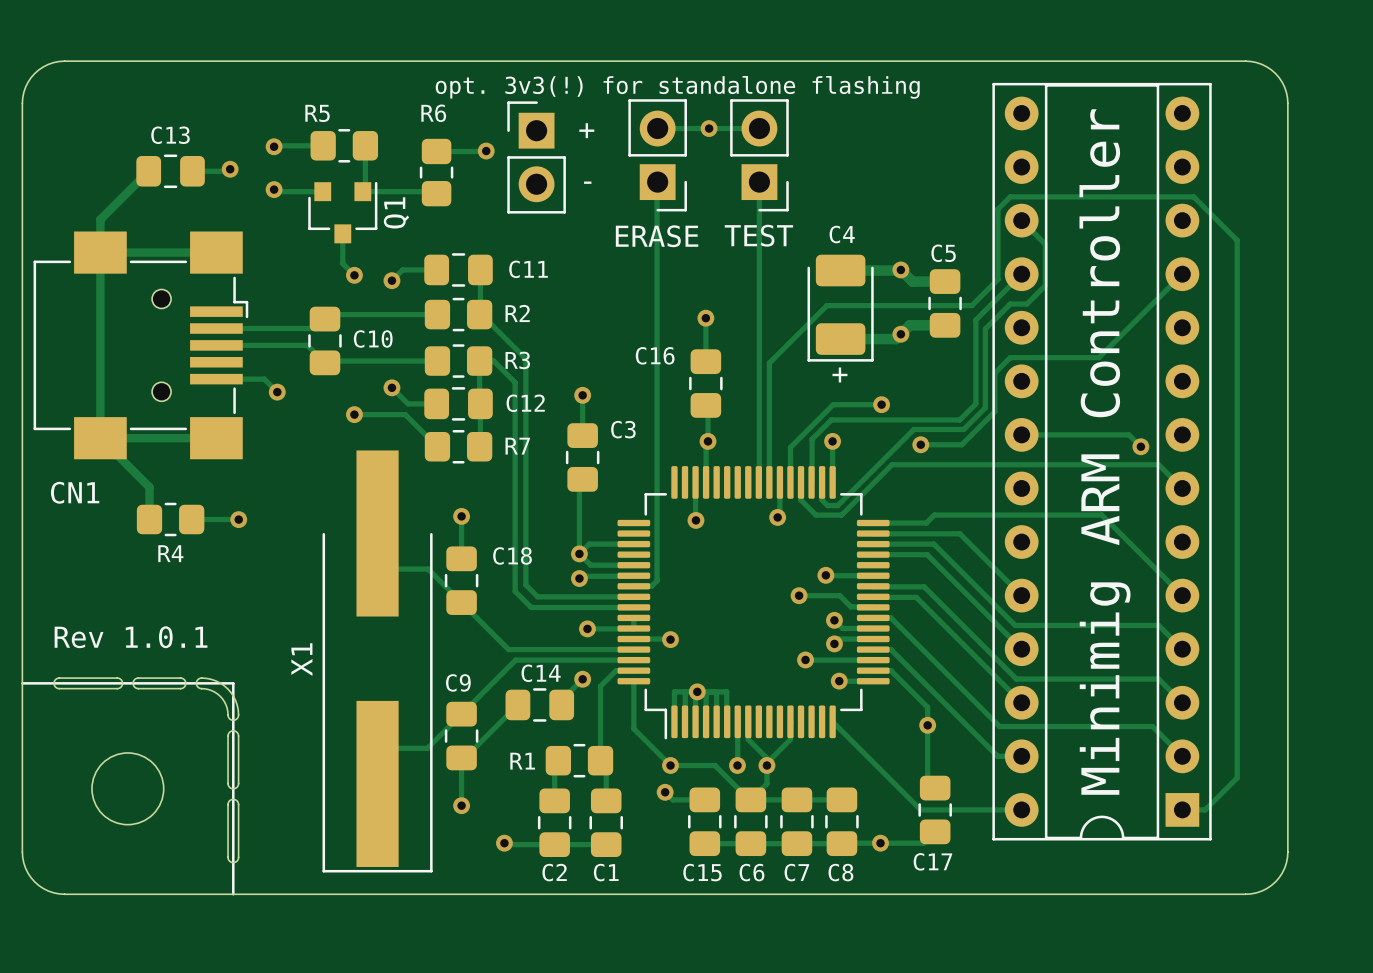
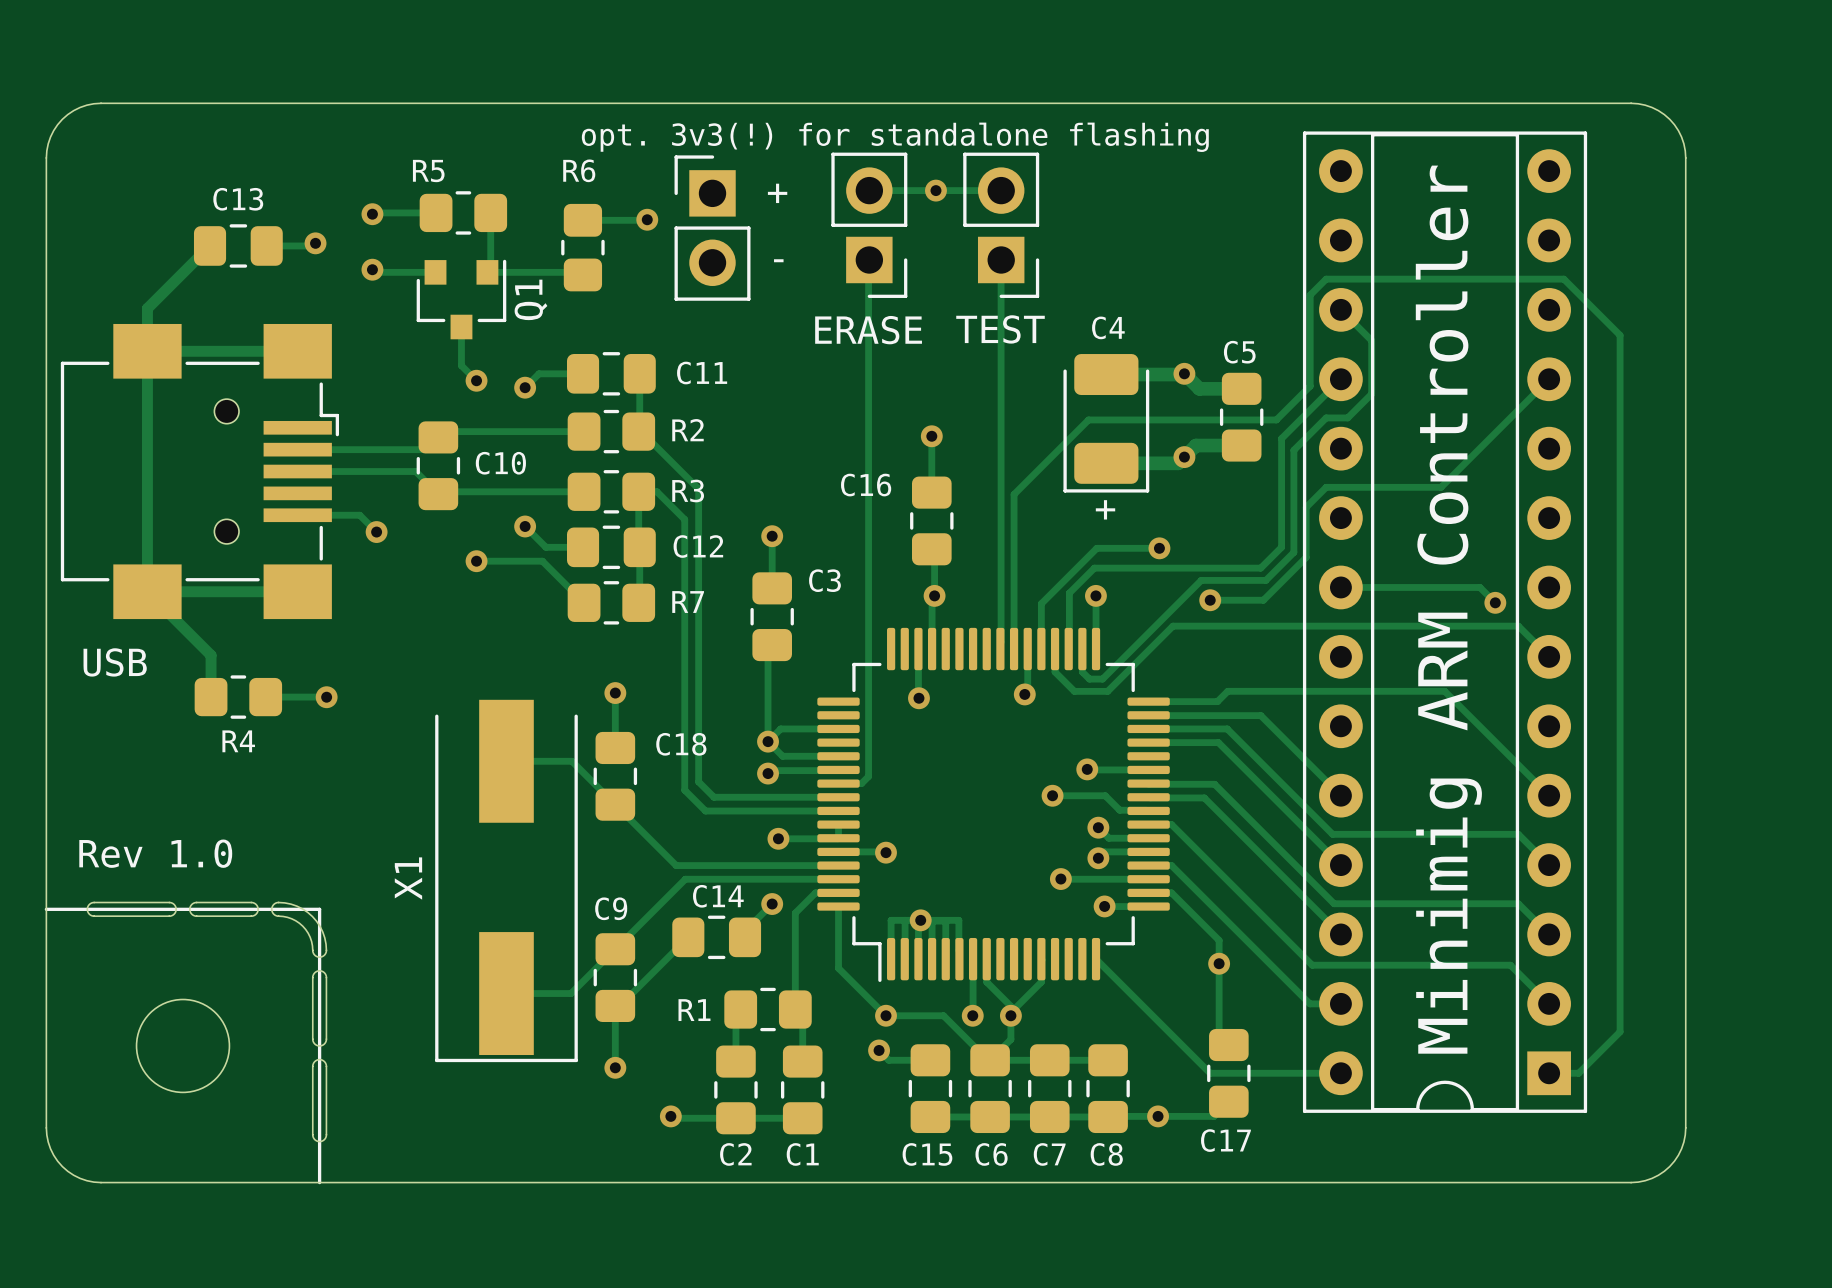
X1 footprint: [322, 450, 433, 873] -> [435, 699, 578, 1063]
CN1 name: CN1 (75, 492) -> USB (115, 662)
text: Rev 1.0.1 (131, 637) -> Rev 1.0 (155, 853)

